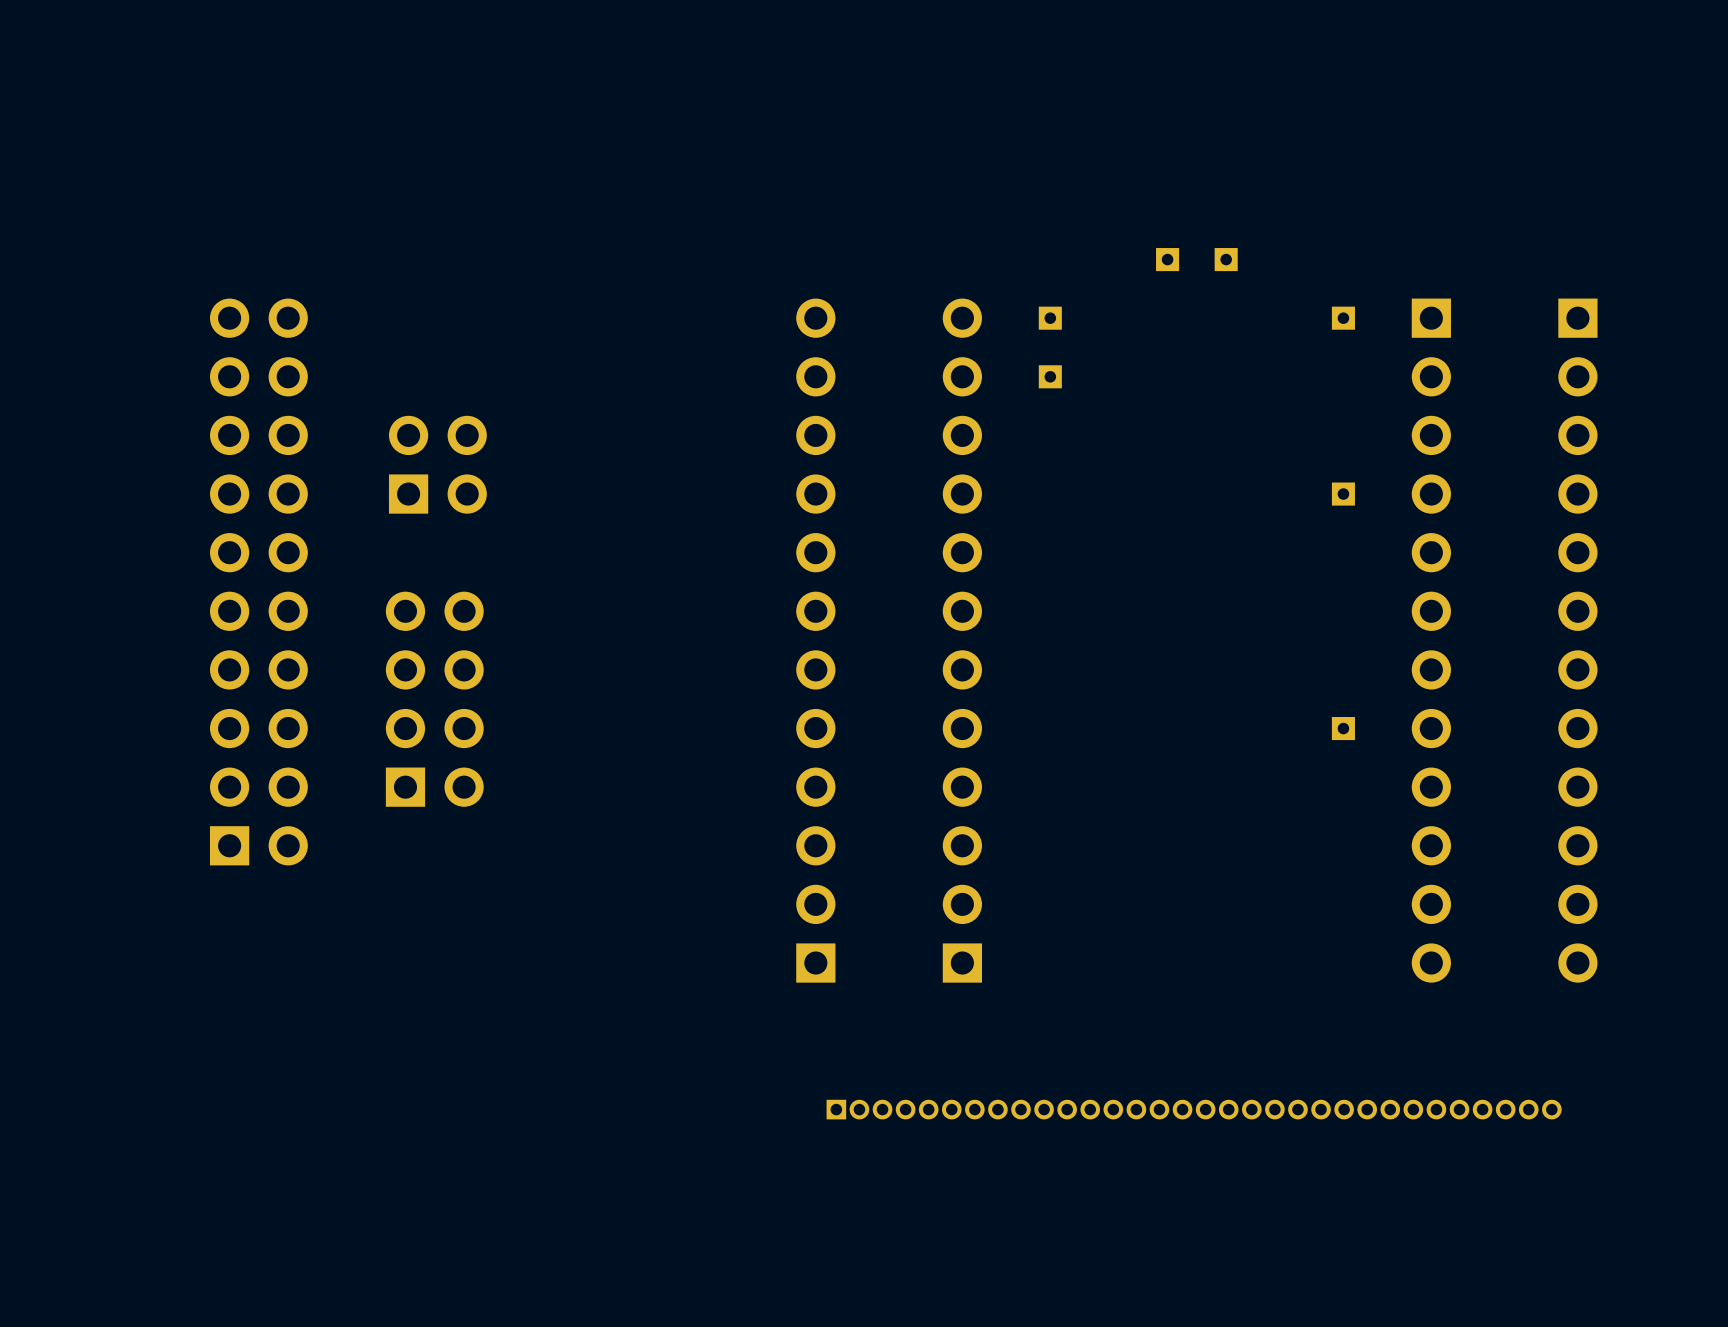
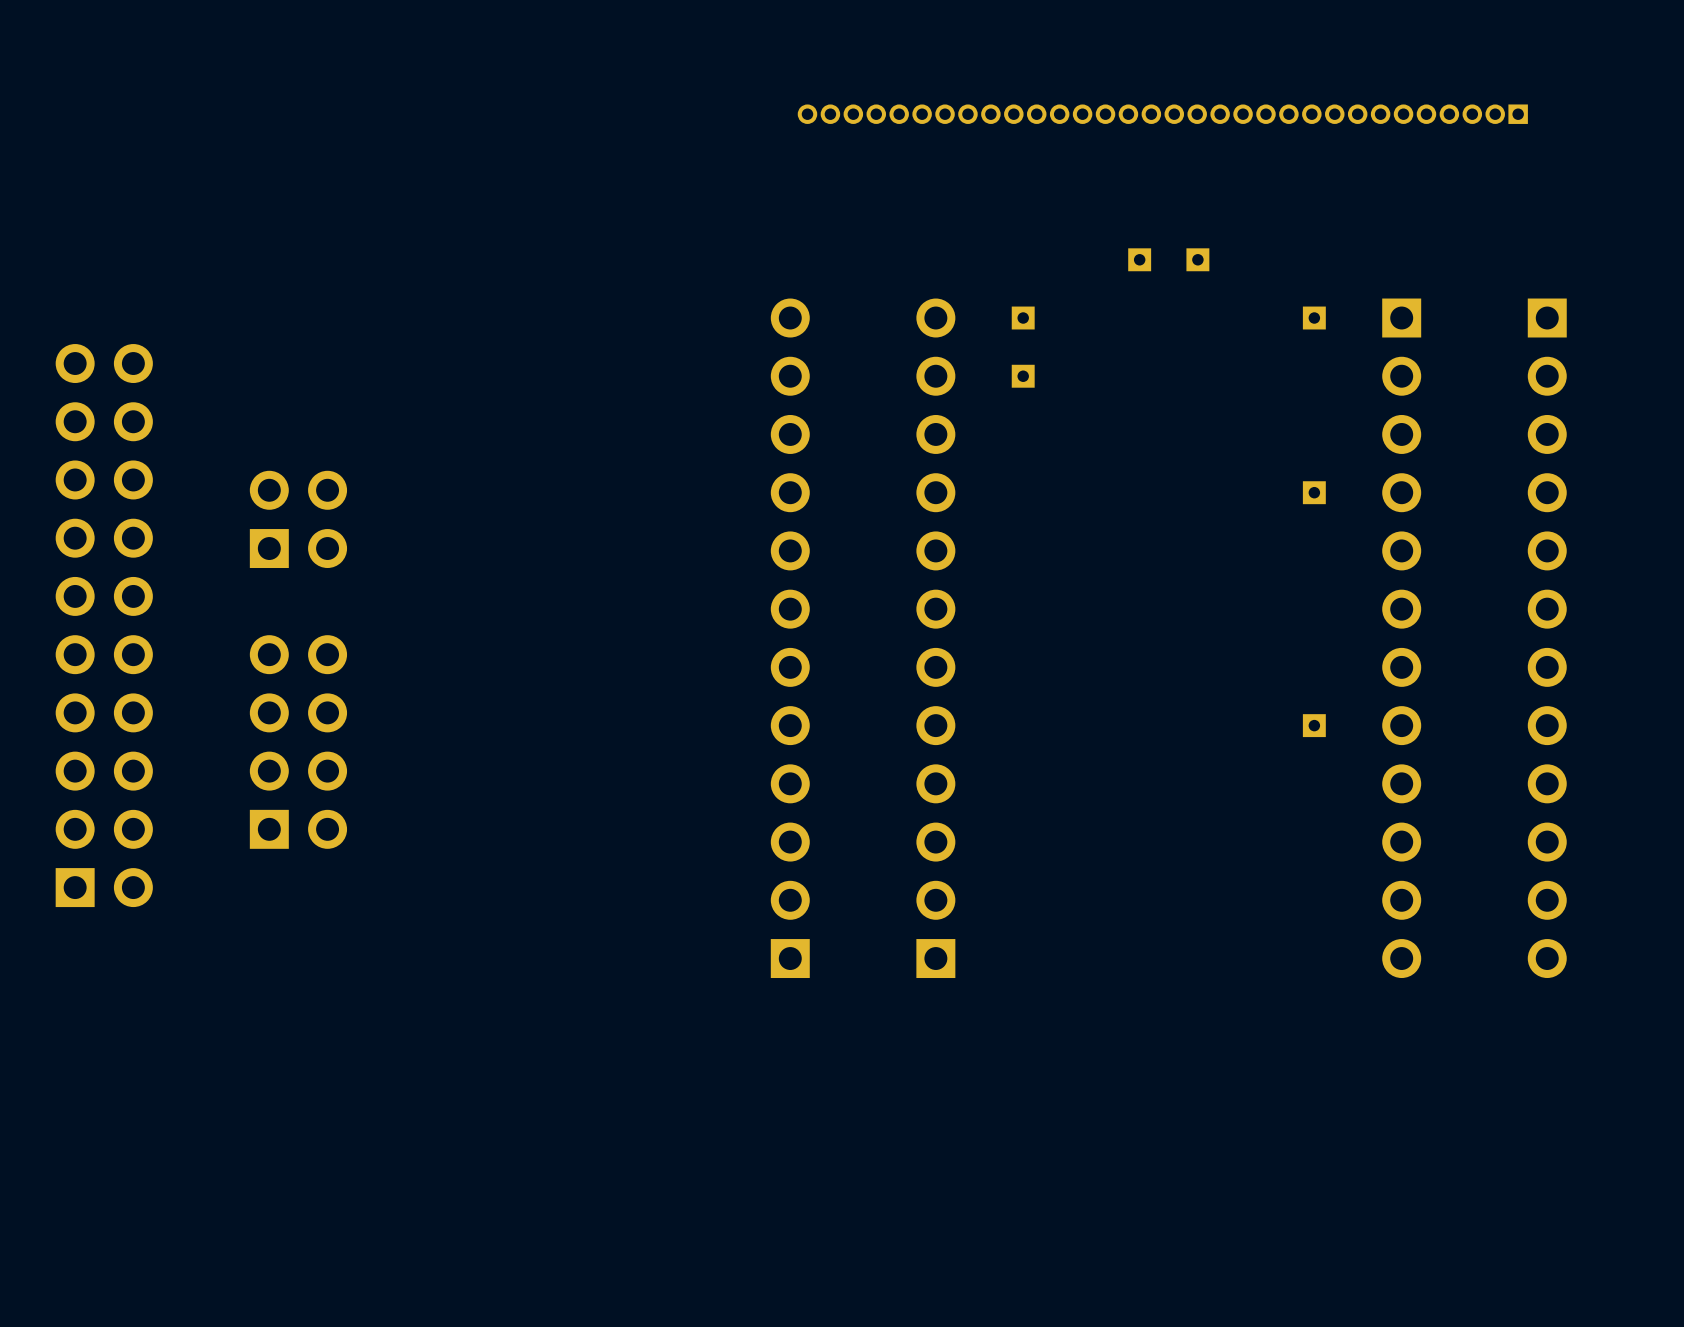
part: none -> (1162, 114)
part position: (437, 464) -> (298, 519)
part position: (258, 581) -> (104, 625)
part position: (434, 699) -> (298, 742)
part: (1194, 1109) -> none

